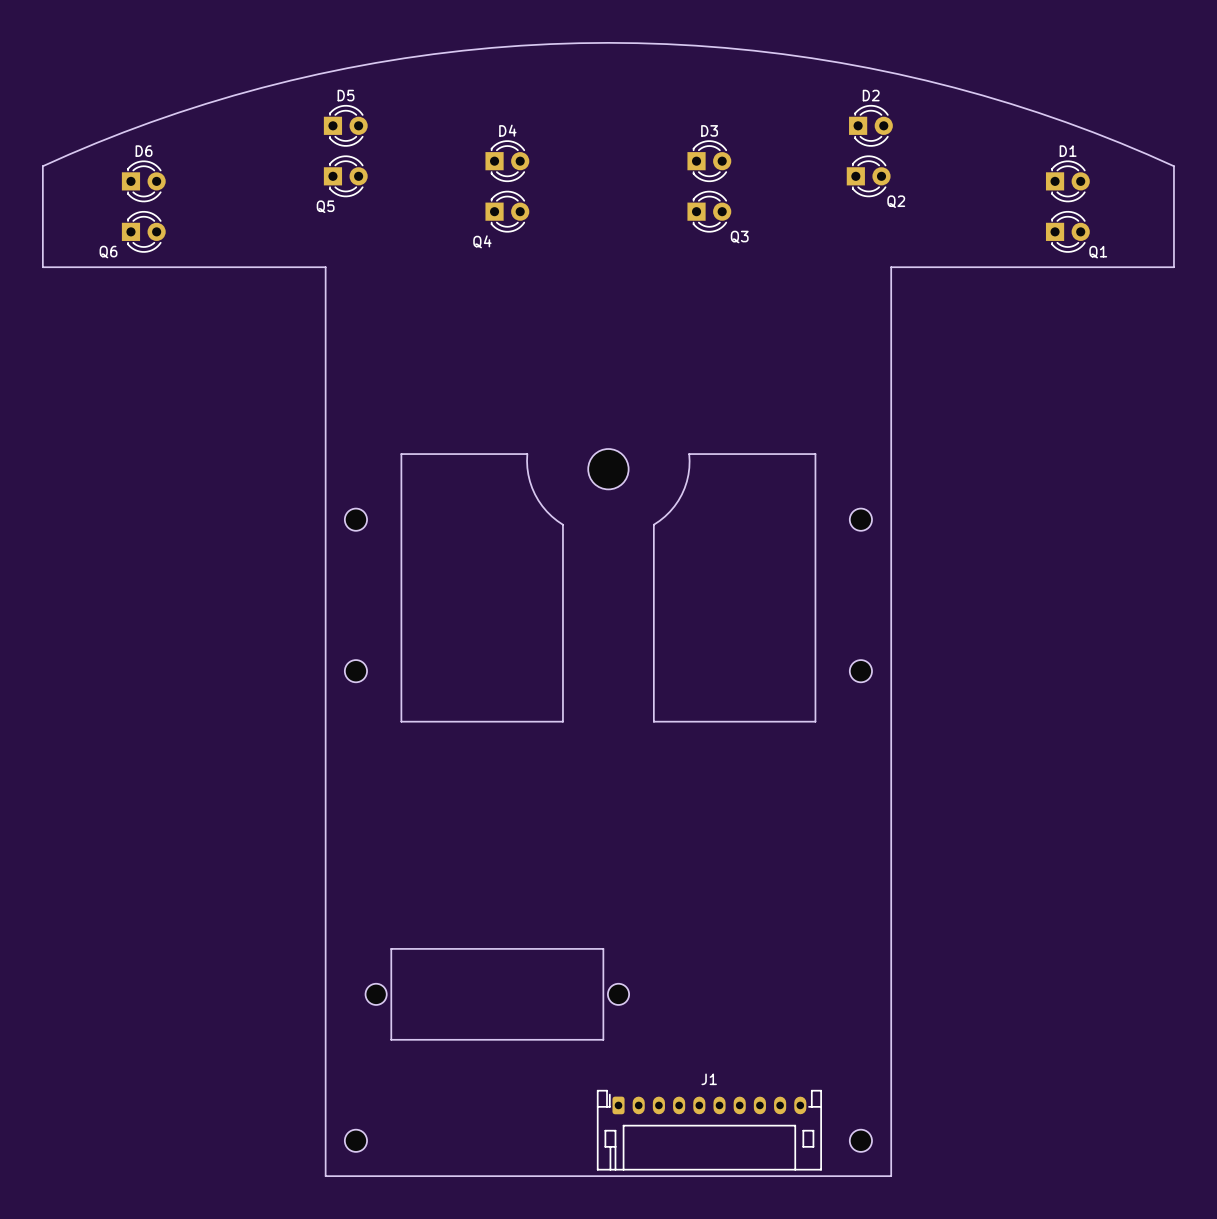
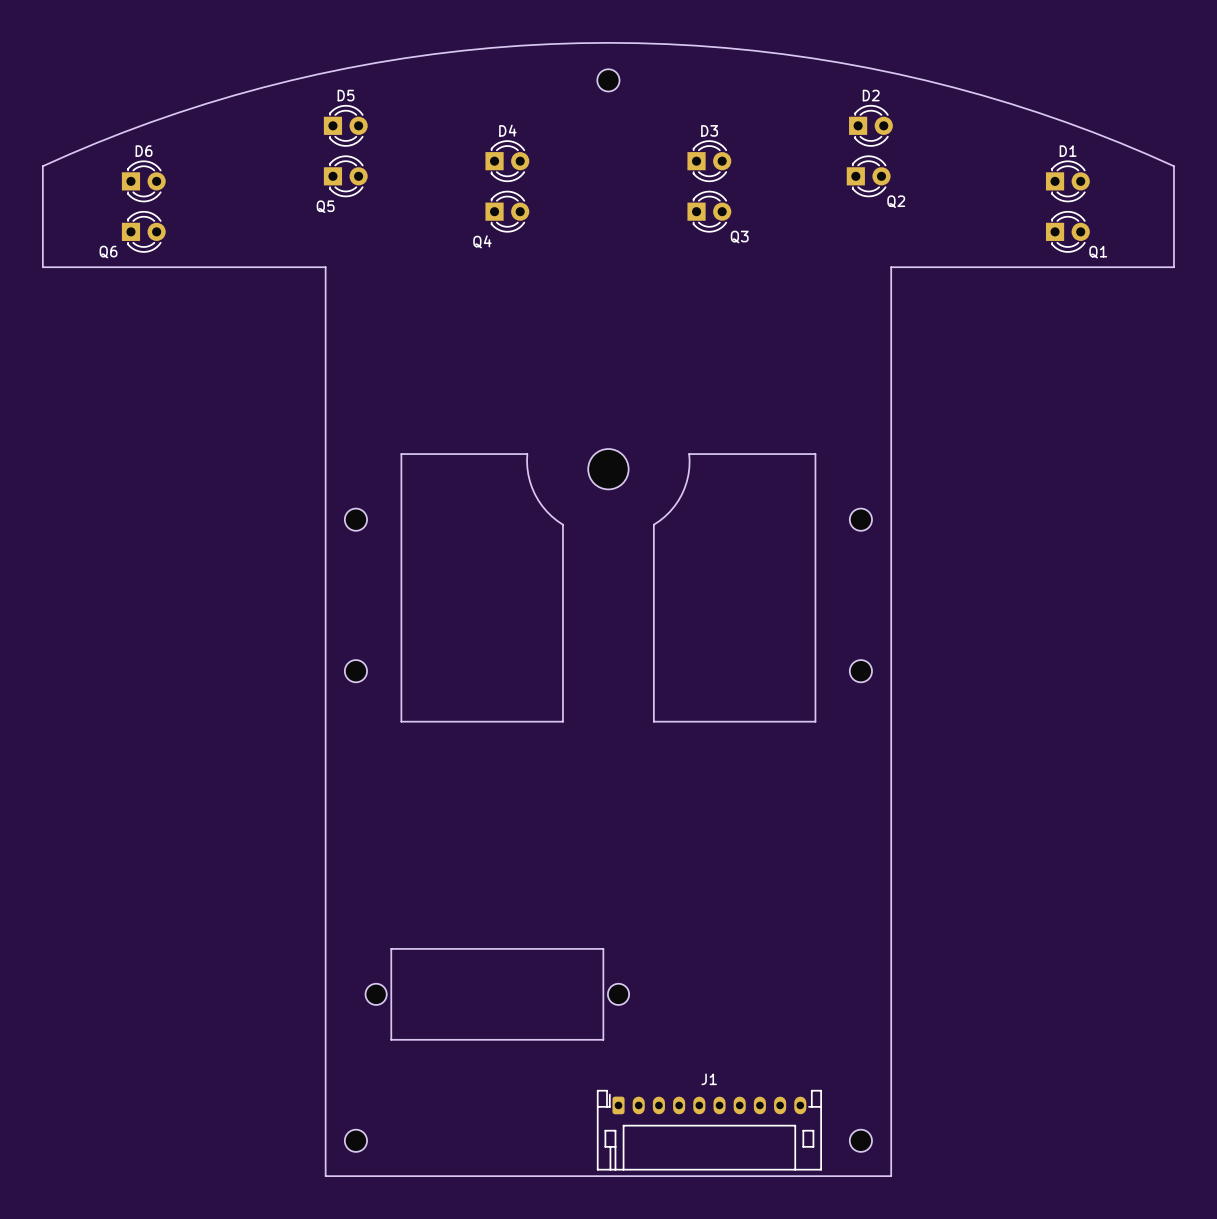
part: none -> (608, 80)

